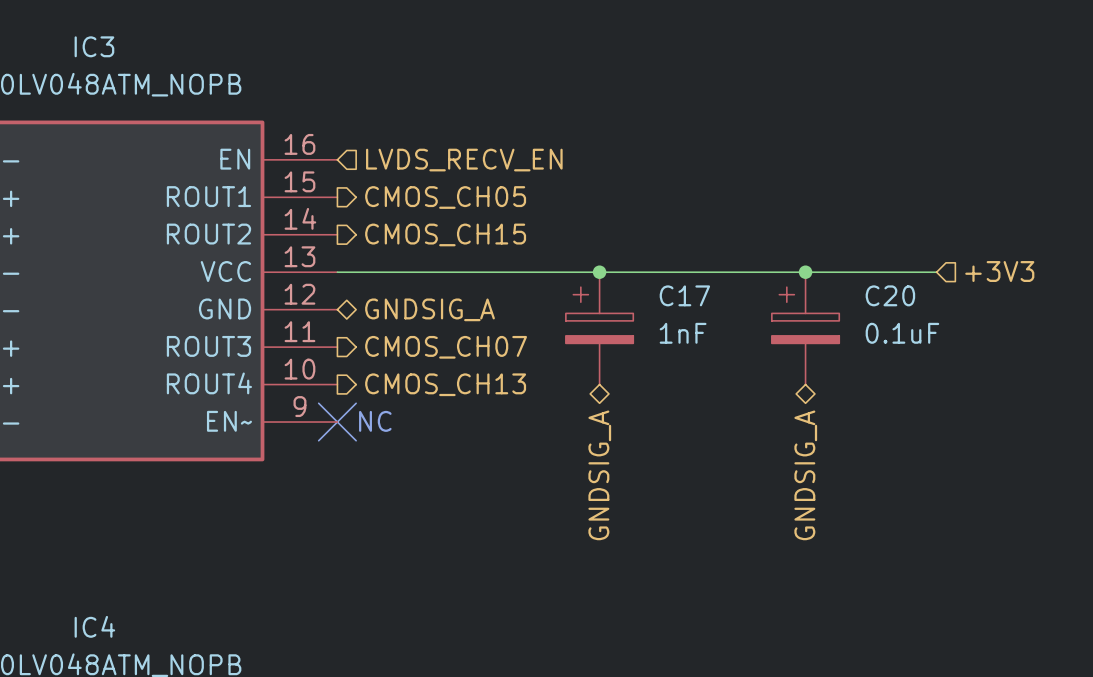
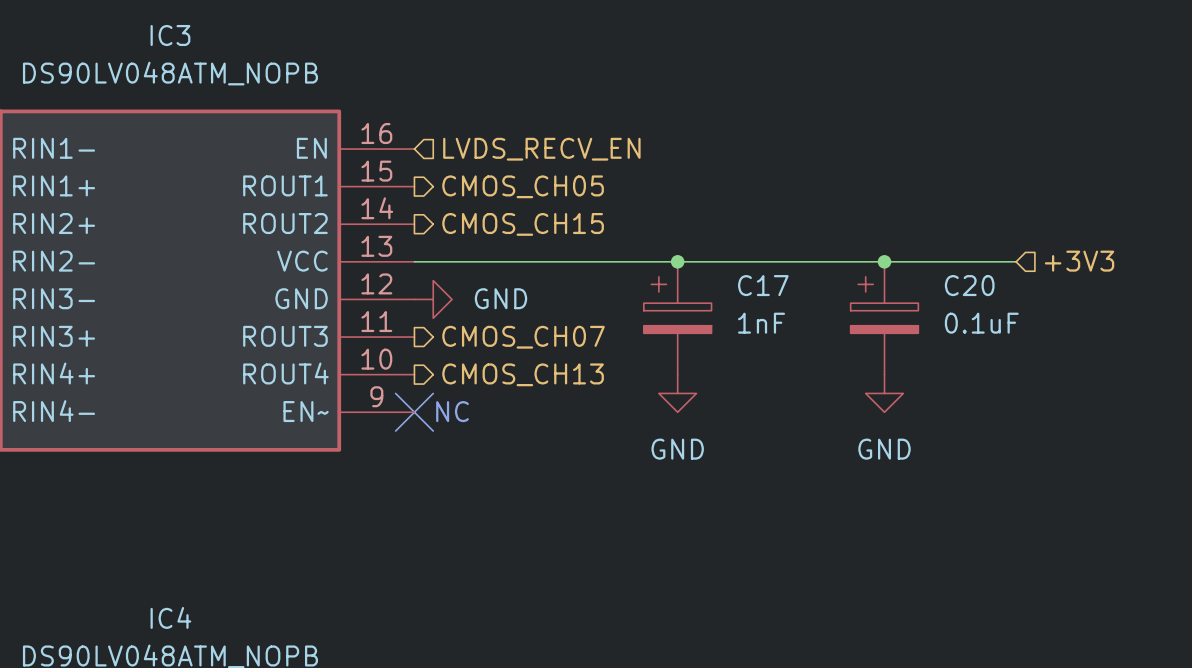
power symbol: none -> GND (433, 299)
hierarchical label: GNDSIG_A (430, 309) -> none
power symbol: none -> GND (677, 393)
power symbol: none -> GND (884, 393)
hierarchical label: GNDSIG_A (599, 475) -> none
hierarchical label: GNDSIG_A (805, 475) -> none

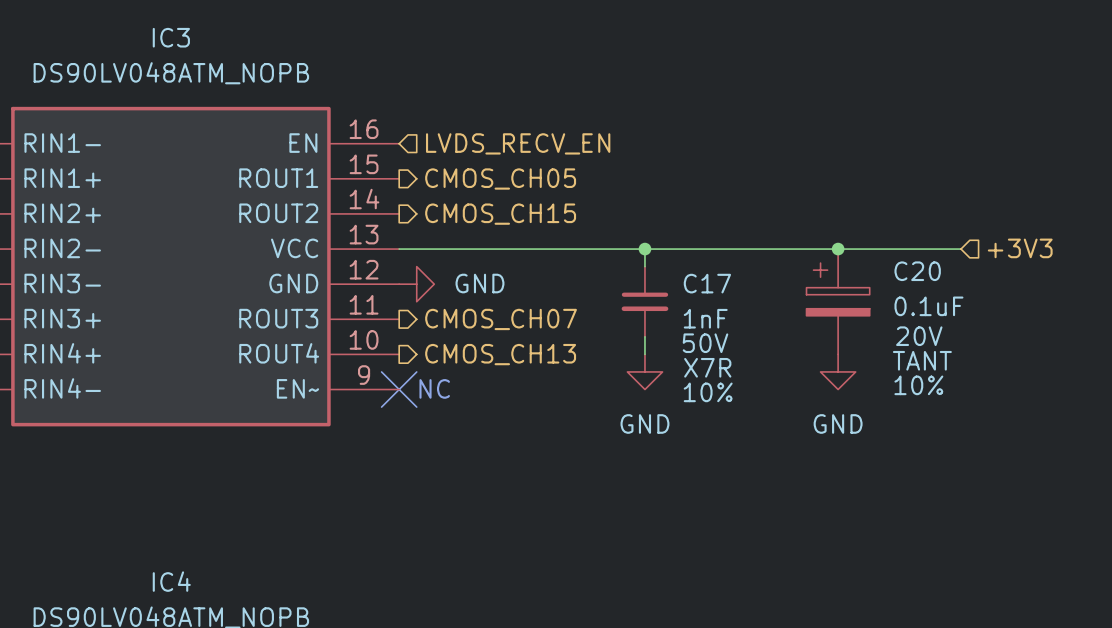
C17 symbol: [643, 261, 712, 375] -> [621, 266, 669, 337]
C20 text: none -> 20V (919, 336)
C17 text: none -> 50V (705, 343)
C20 text: none -> TANT (922, 360)
C17 text: none -> X7R (707, 367)
C20 text: none -> 10% (918, 385)
C17 text: none -> 10% (708, 392)

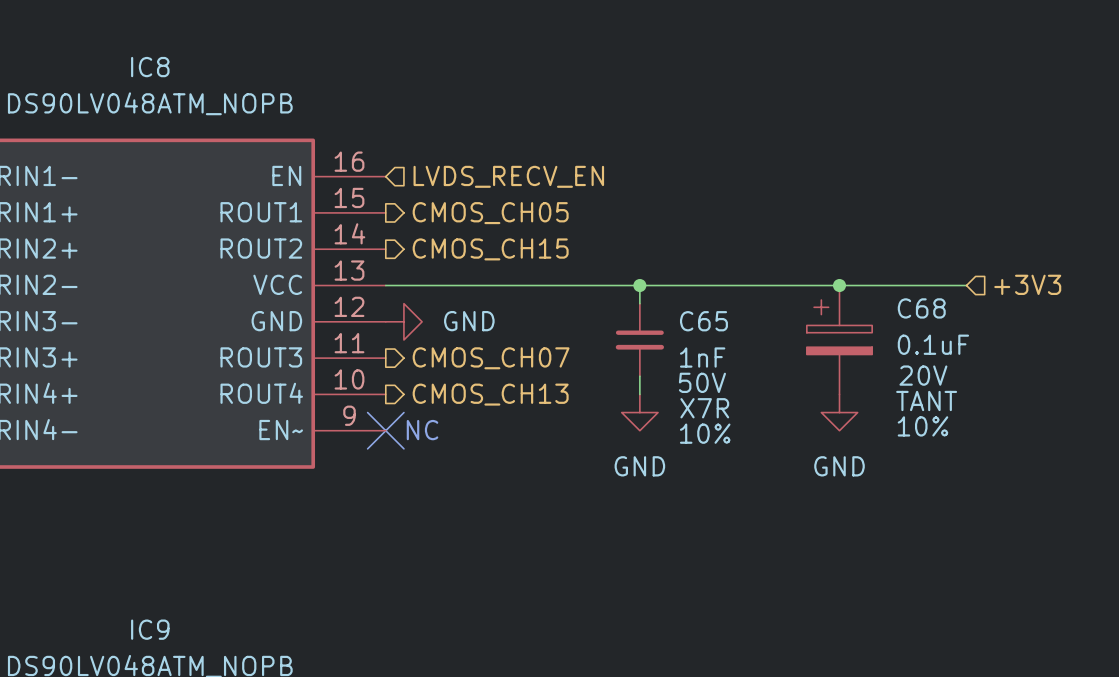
IC3 name: IC3 (171, 37) -> IC8 (150, 67)
C20 name: C20 (917, 271) -> C68 (921, 308)
C17 name: C17 (707, 283) -> C65 (703, 321)
IC4 name: IC4 (171, 581) -> IC9 (150, 629)

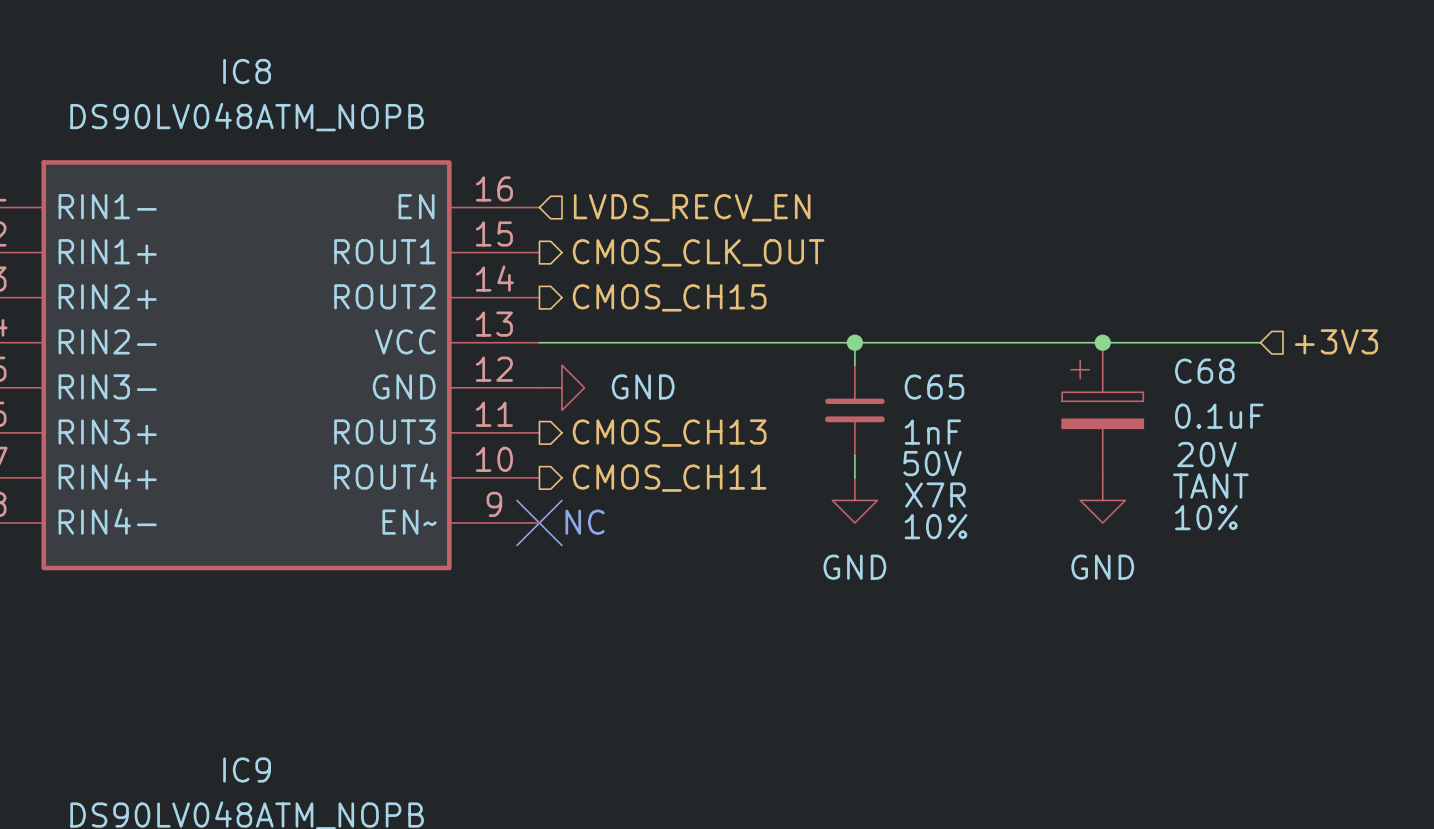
hierarchical label: CMOS_CH05 (490, 213) -> CMOS_CLK_OUT (698, 252)
hierarchical label: CMOS_CH07 (491, 358) -> CMOS_CH13 (669, 433)
hierarchical label: CMOS_CH13 (490, 394) -> CMOS_CH11 (669, 478)

